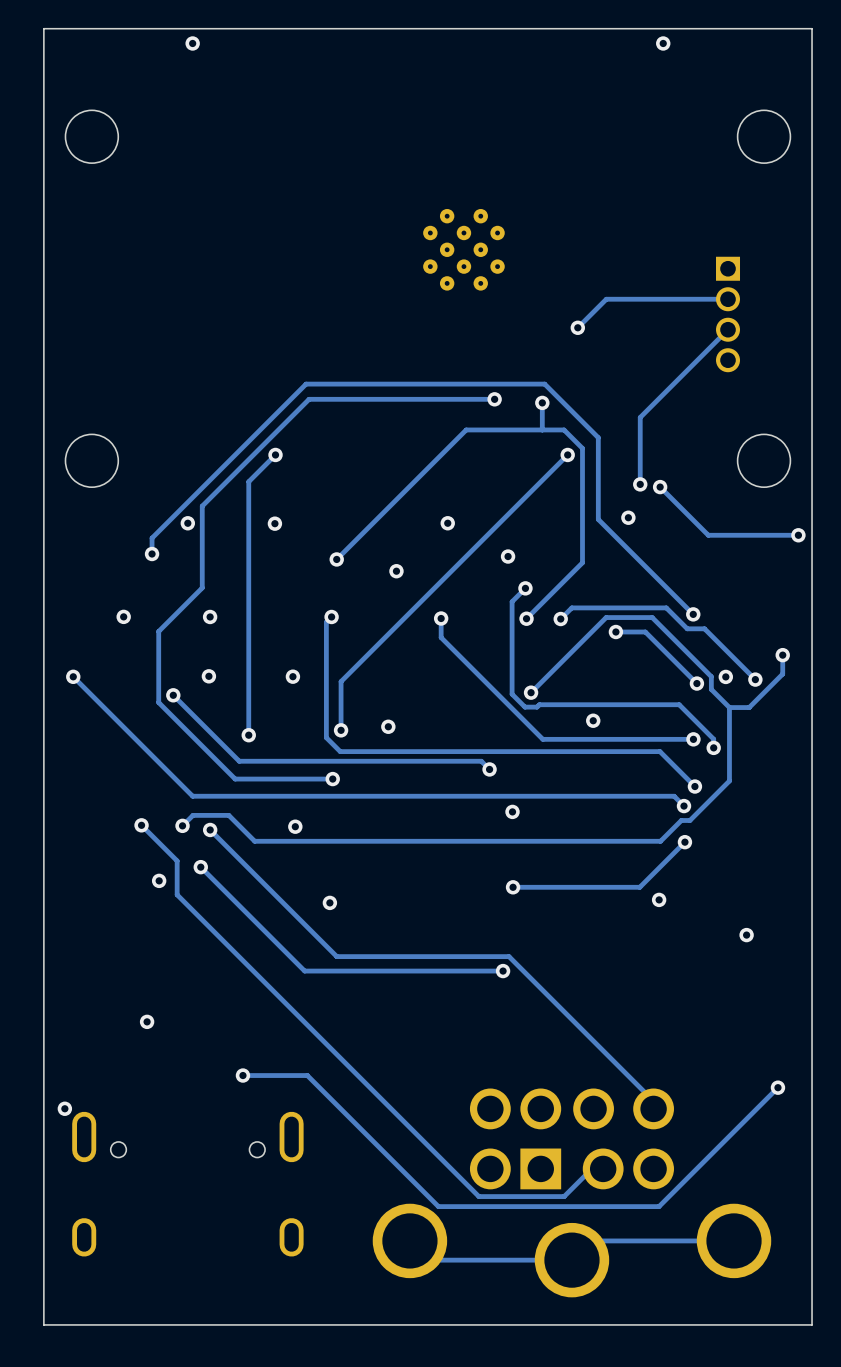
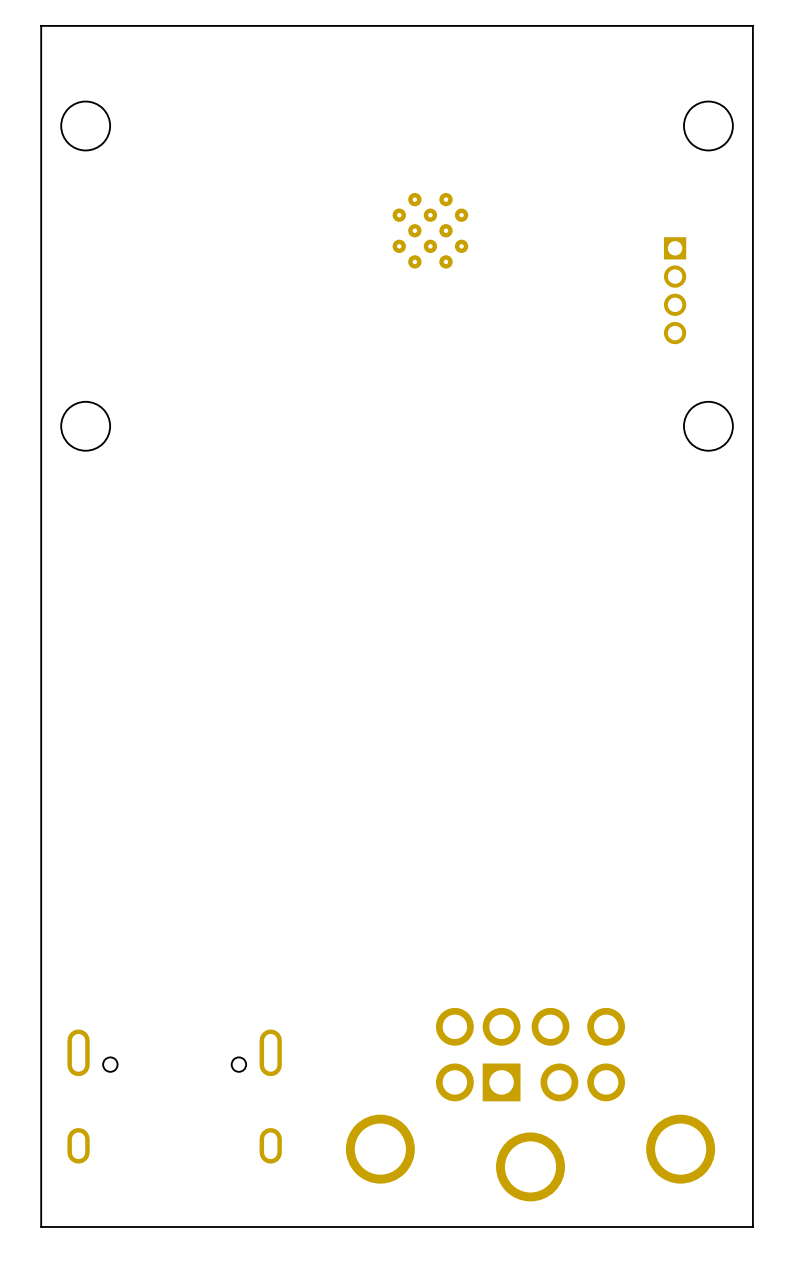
via: (192, 43) -> none
via: (663, 43) -> none
track: (728, 299) (606, 299) (577, 327) -> none
via: (577, 327) -> none
track: (728, 329) (640, 417) (640, 484) -> none
track: (494, 399) (309, 399) (202, 506) (202, 587) (158, 631) (158, 702) (235, 779) (332, 779) -> none
via: (494, 399) -> none
track: (542, 402) (542, 429) -> none
via: (542, 402) -> none
track: (275, 454) (248, 481) (248, 735) -> none
via: (275, 454) -> none
track: (567, 454) (341, 681) (341, 730) -> none
via: (567, 454) -> none
via: (640, 484) -> none
track: (660, 487) (708, 535) (798, 535) -> none
via: (660, 487) -> none
via: (628, 517) -> none
via: (187, 523) -> none
via: (274, 523) -> none
via: (447, 523) -> none
via: (798, 535) -> none
track: (152, 554) (152, 538) (306, 384) (544, 384) (598, 437) (598, 519) (693, 614) -> none
via: (152, 554) -> none
via: (508, 556) -> none
track: (336, 559) (466, 429) (564, 429) (582, 448) (582, 562) (526, 618) -> none
via: (336, 559) -> none
via: (396, 571) -> none
track: (525, 588) (512, 601) (512, 694) (525, 707) (537, 707) (539, 704) (679, 704) (713, 739) (713, 747) -> none
via: (525, 588) -> none
via: (693, 614) -> none
via: (123, 616) -> none
via: (210, 616) -> none
track: (331, 616) (326, 622) (326, 737) (340, 751) (660, 751) (694, 786) -> none
via: (331, 616) -> none
track: (441, 618) (441, 637) (542, 739) (693, 739) -> none
via: (441, 618) -> none
via: (526, 618) -> none
track: (560, 619) (571, 607) (666, 607) (687, 628) (704, 628) (755, 679) -> none
via: (560, 619) -> none
track: (615, 632) (645, 632) (696, 683) -> none
via: (615, 632) -> none
track: (782, 655) (782, 674) (749, 707) (729, 707) -> none
via: (782, 655) -> none
track: (73, 676) (192, 796) (674, 796) (683, 806) -> none
via: (73, 676) -> none
via: (208, 676) -> none
via: (292, 676) -> none
via: (725, 676) -> none
via: (755, 679) -> none
via: (696, 683) -> none
track: (531, 692) (606, 617) (652, 617) (711, 676) (711, 689) (729, 707) -> none
via: (531, 692) -> none
track: (173, 695) (239, 761) (481, 761) (489, 769) -> none
via: (173, 695) -> none
track: (729, 707) (729, 781) (689, 820) (681, 820) (660, 841) (254, 841) (228, 815) (192, 815) (182, 825) -> none
via: (593, 720) -> none
via: (388, 726) -> none
via: (341, 730) -> none
via: (248, 735) -> none
via: (693, 739) -> none
via: (713, 747) -> none
via: (489, 769) -> none
via: (332, 779) -> none
via: (694, 786) -> none
via: (683, 806) -> none
via: (512, 811) -> none
track: (141, 825) (177, 860) (177, 894) (478, 1196) (564, 1196) (591, 1168) (603, 1168) -> none
via: (141, 825) -> none
via: (182, 825) -> none
via: (295, 826) -> none
track: (210, 829) (336, 956) (509, 956) (653, 1101) (653, 1108) -> none
via: (210, 829) -> none
track: (684, 842) (639, 887) (513, 887) -> none
via: (684, 842) -> none
track: (200, 867) (304, 971) (503, 971) -> none
via: (200, 867) -> none
via: (159, 880) -> none
via: (513, 887) -> none
via: (659, 899) -> none
via: (329, 902) -> none
via: (746, 935) -> none
via: (503, 971) -> none
via: (147, 1021) -> none
track: (242, 1075) (307, 1075) (438, 1206) (659, 1206) (777, 1087) -> none
via: (242, 1075) -> none
via: (777, 1087) -> none
via: (64, 1108) -> none
track: (734, 1240) (591, 1240) (571, 1260) (429, 1260) (409, 1240) -> none

